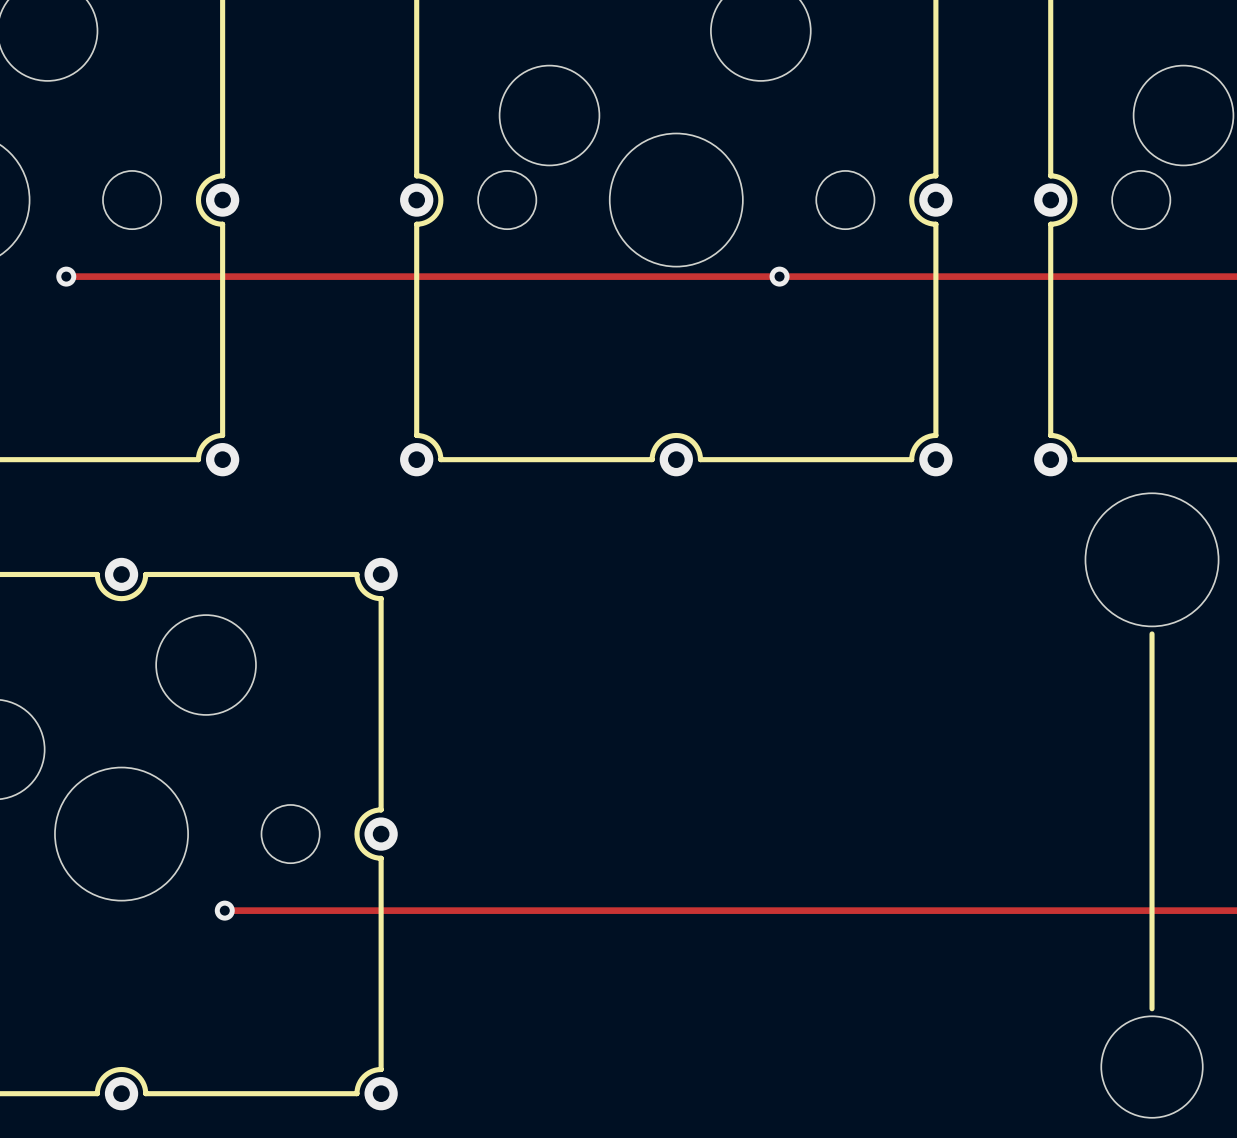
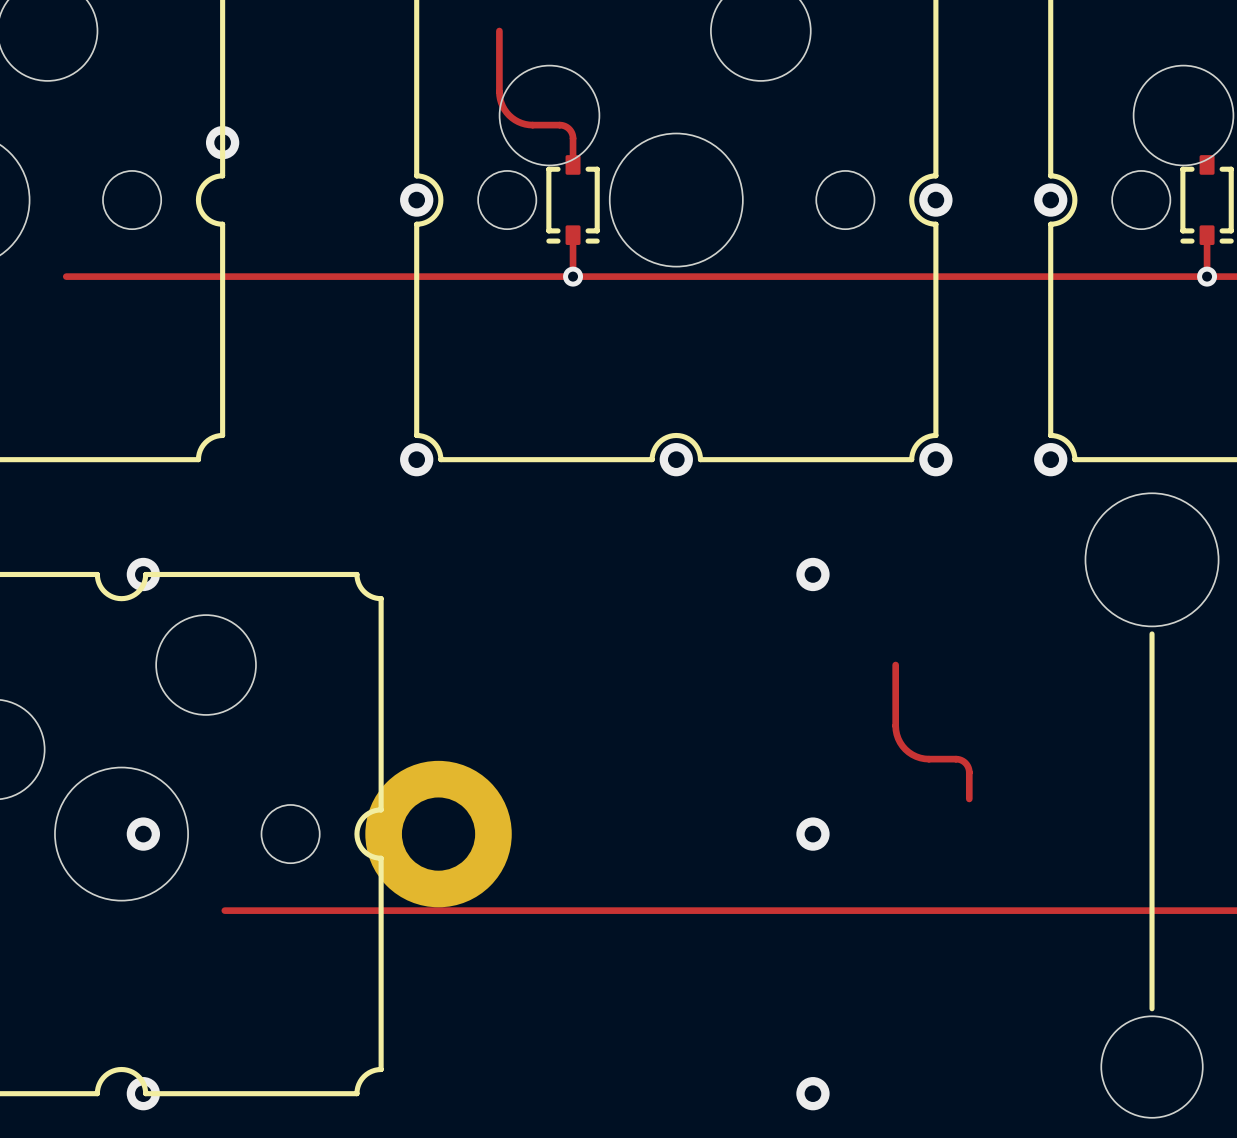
track: none -> (499, 30) (499, 91) (502, 106) (511, 117) (521, 123) (561, 125) (568, 128) (572, 136) (573, 164)
via position: (222, 200) -> (222, 142)
part: none -> (573, 200)
part: none -> (1207, 200)
track: none -> (573, 235) (573, 276)
track: none -> (1207, 235) (1207, 276)
via: (66, 276) -> none
via: none -> (573, 276)
via: (779, 276) -> none
via: none -> (1207, 276)
via: (222, 459) -> none
via position: (121, 574) -> (143, 574)
via: (381, 574) -> none
via: none -> (812, 574)
track: none -> (895, 665) (895, 725) (900, 742) (908, 752) (920, 757) (957, 759) (964, 761) (969, 770) (969, 798)
via: none -> (143, 834)
via: (381, 834) -> none
part: none -> (438, 834)
via: none -> (812, 834)
via: (224, 910) -> none
via position: (121, 1093) -> (143, 1093)
via: (381, 1093) -> none
via: none -> (812, 1093)

